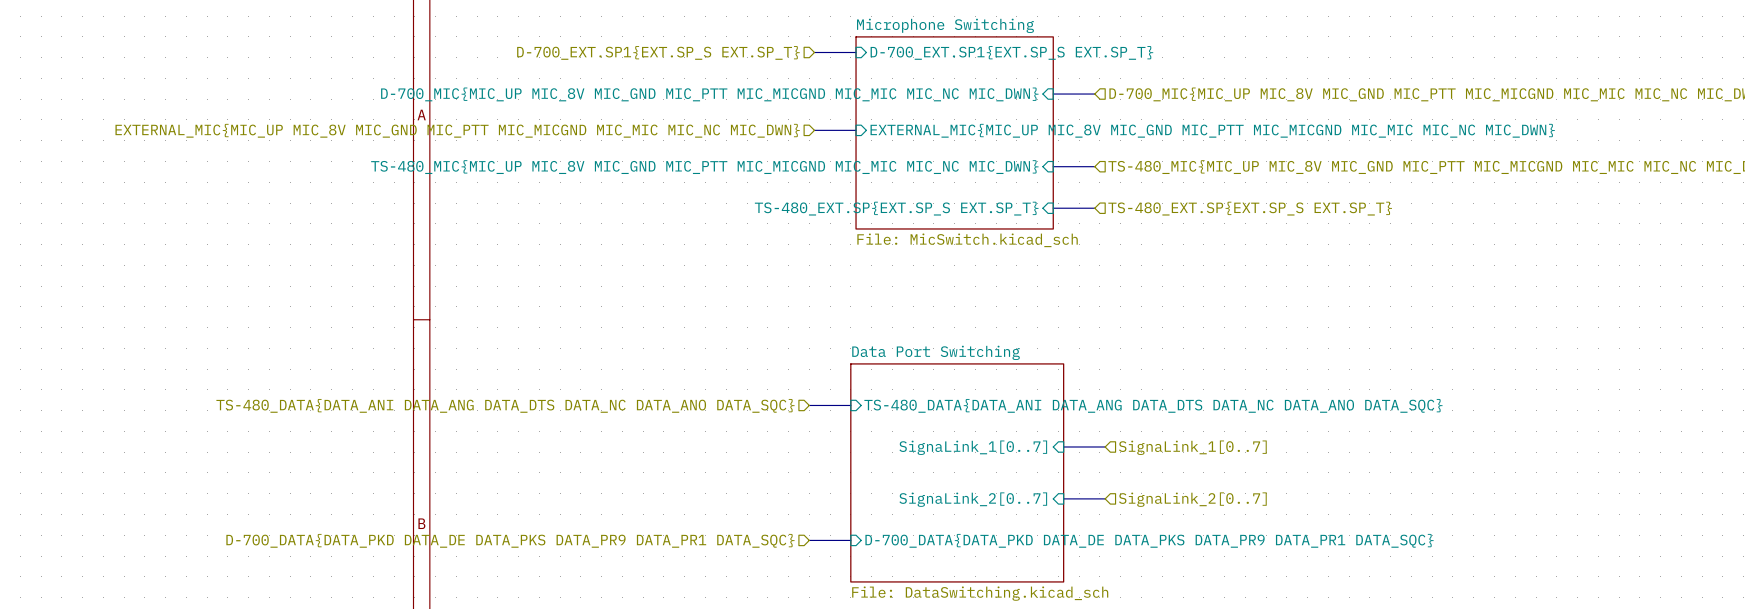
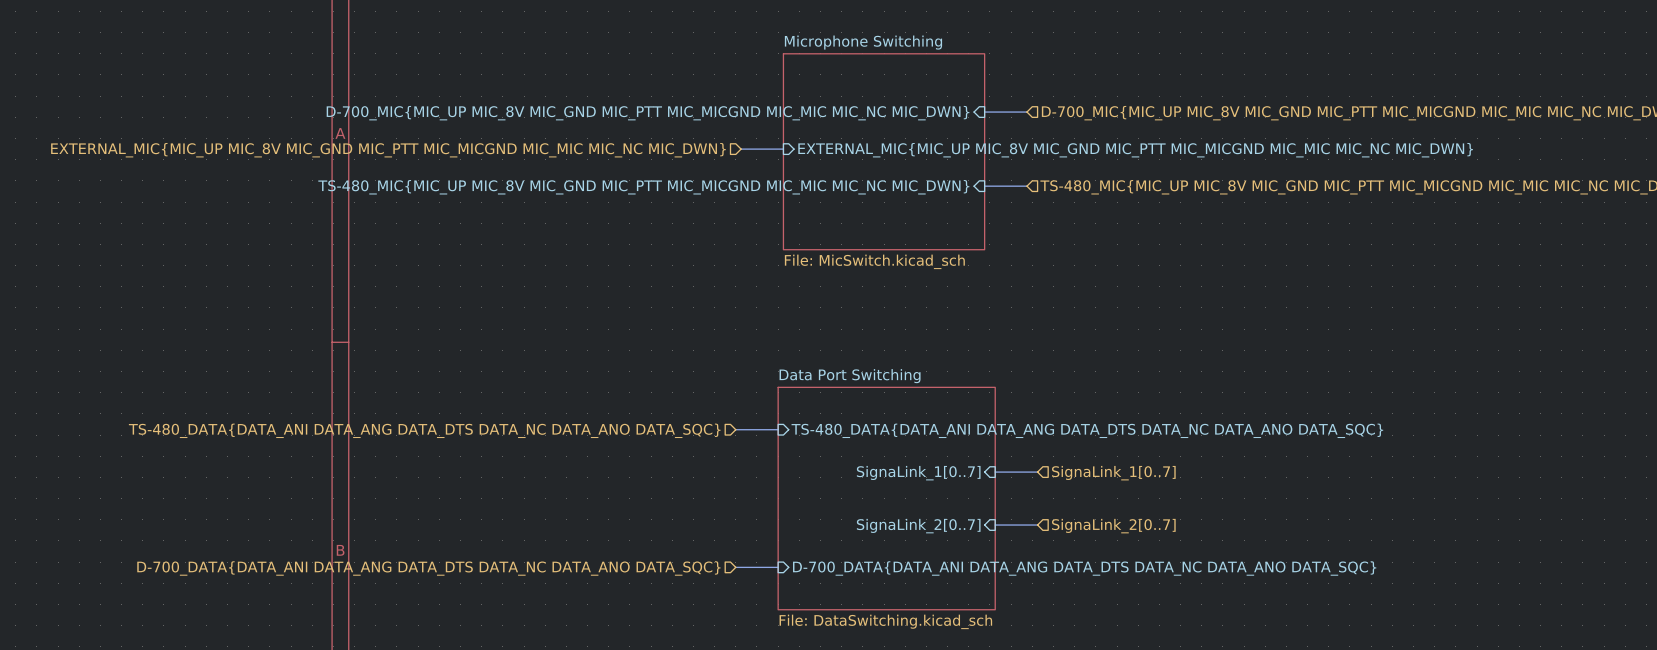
hierarchical label: D-700_EXT.SP1{EXT.SP_S EXT.SP_T} (658, 52) -> none
bus: (814, 52) (856, 52) -> none
sheet pin: D-700_EXT.SP1{EXT.SP_S EXT.SP_T} (1011, 52) -> none
sheet pin: TS-480_EXT.SP{EXT.SP_S EXT.SP_T} (896, 208) -> none
bus: (1053, 208) (1094, 208) -> none
hierarchical label: TS-480_EXT.SP{EXT.SP_S EXT.SP_T} (1250, 208) -> none
hierarchical label: D-700_DATA{DATA_PKD DATA_DE DATA_PKS DATA_PR9 DATA_PR1 DATA_SQC} (510, 540) -> D-700_DATA{DATA_ANI DATA_ANG DATA_DTS DATA_NC DATA_ANO DATA_SQC} (428, 568)
sheet pin: D-700_DATA{DATA_PKD DATA_DE DATA_PKS DATA_PR9 DATA_PR1 DATA_SQC} (1149, 540) -> D-700_DATA{DATA_ANI DATA_ANG DATA_DTS DATA_NC DATA_ANO DATA_SQC} (1084, 568)

